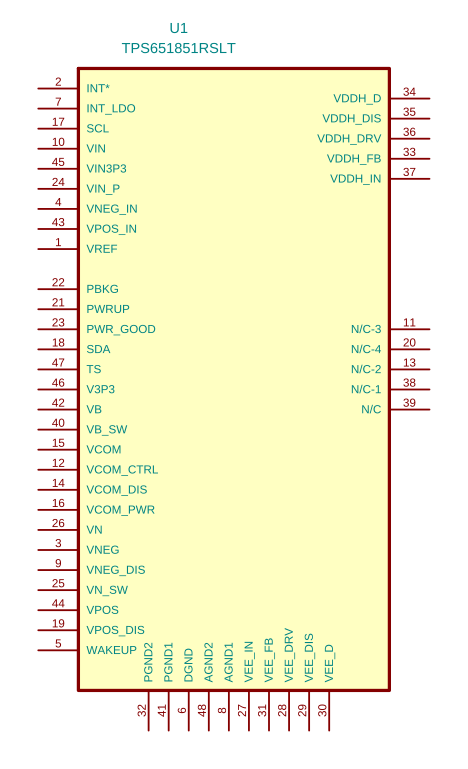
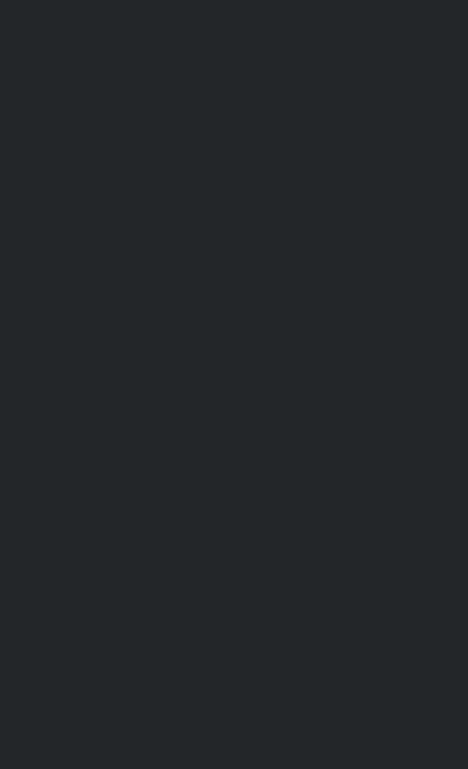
U1: TPS651851RSLT (233, 398) -> none

